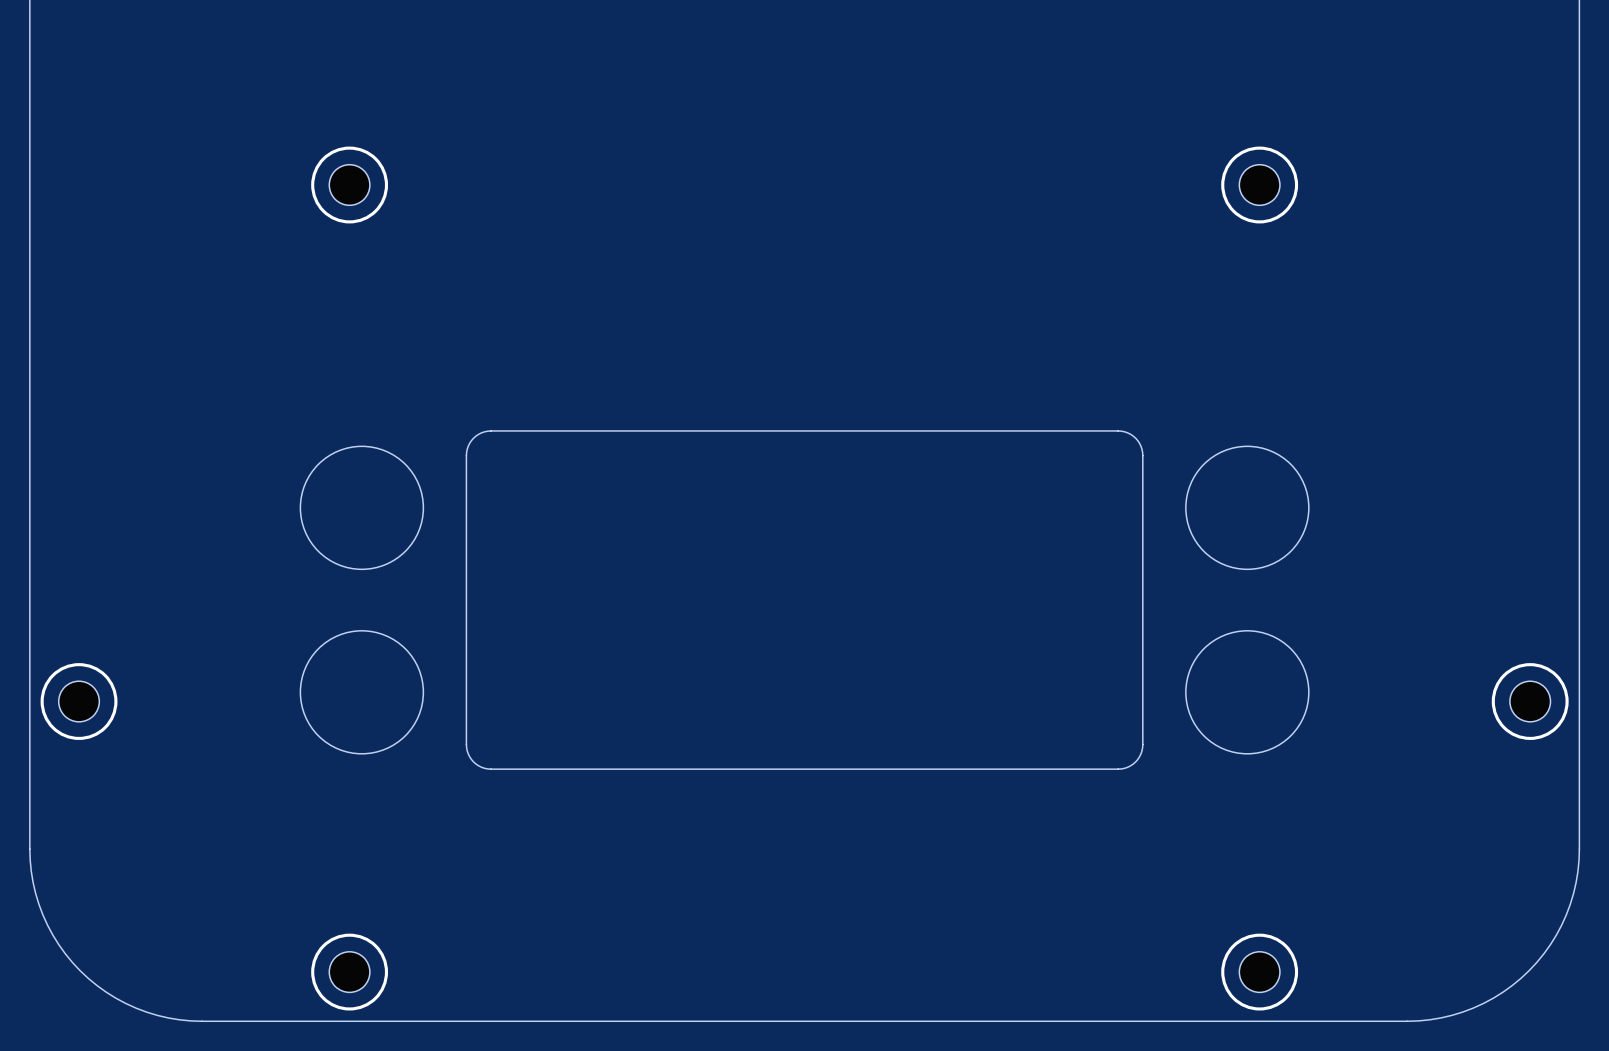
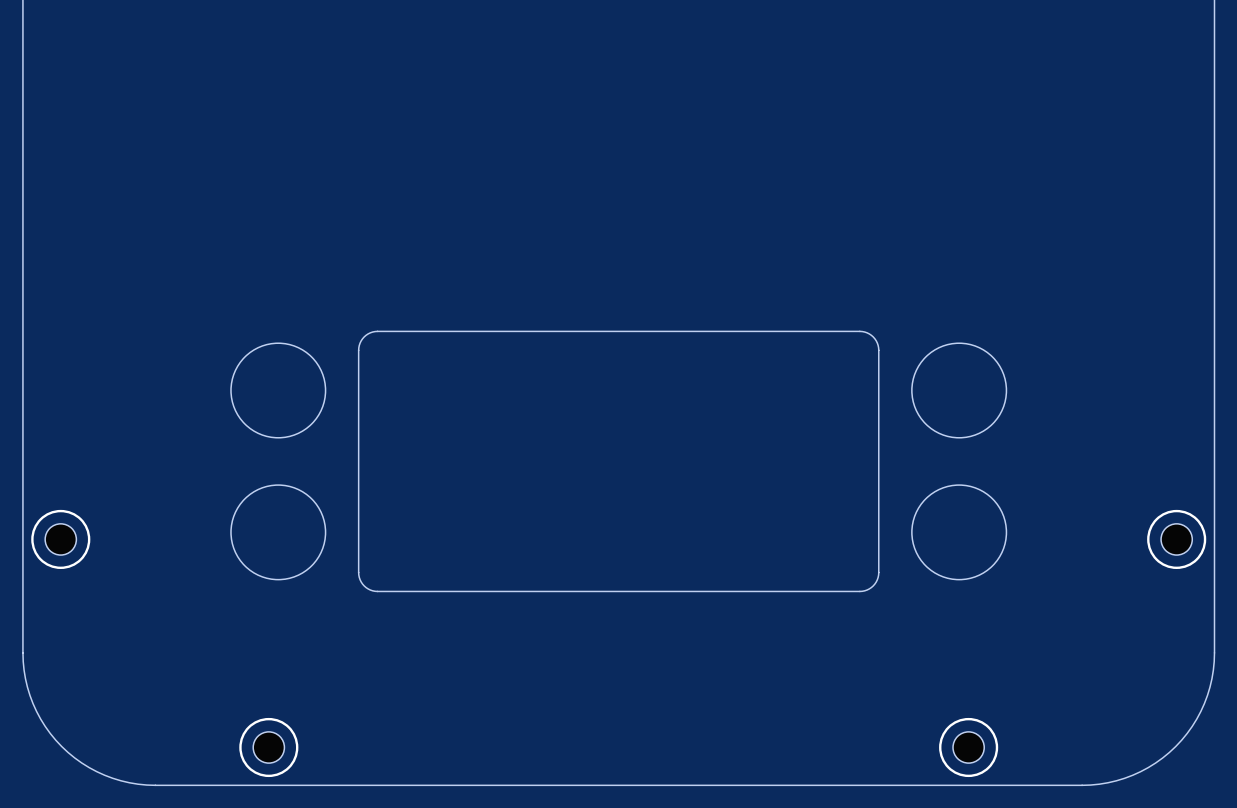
part: (349, 185) -> none
part: (1259, 185) -> none

